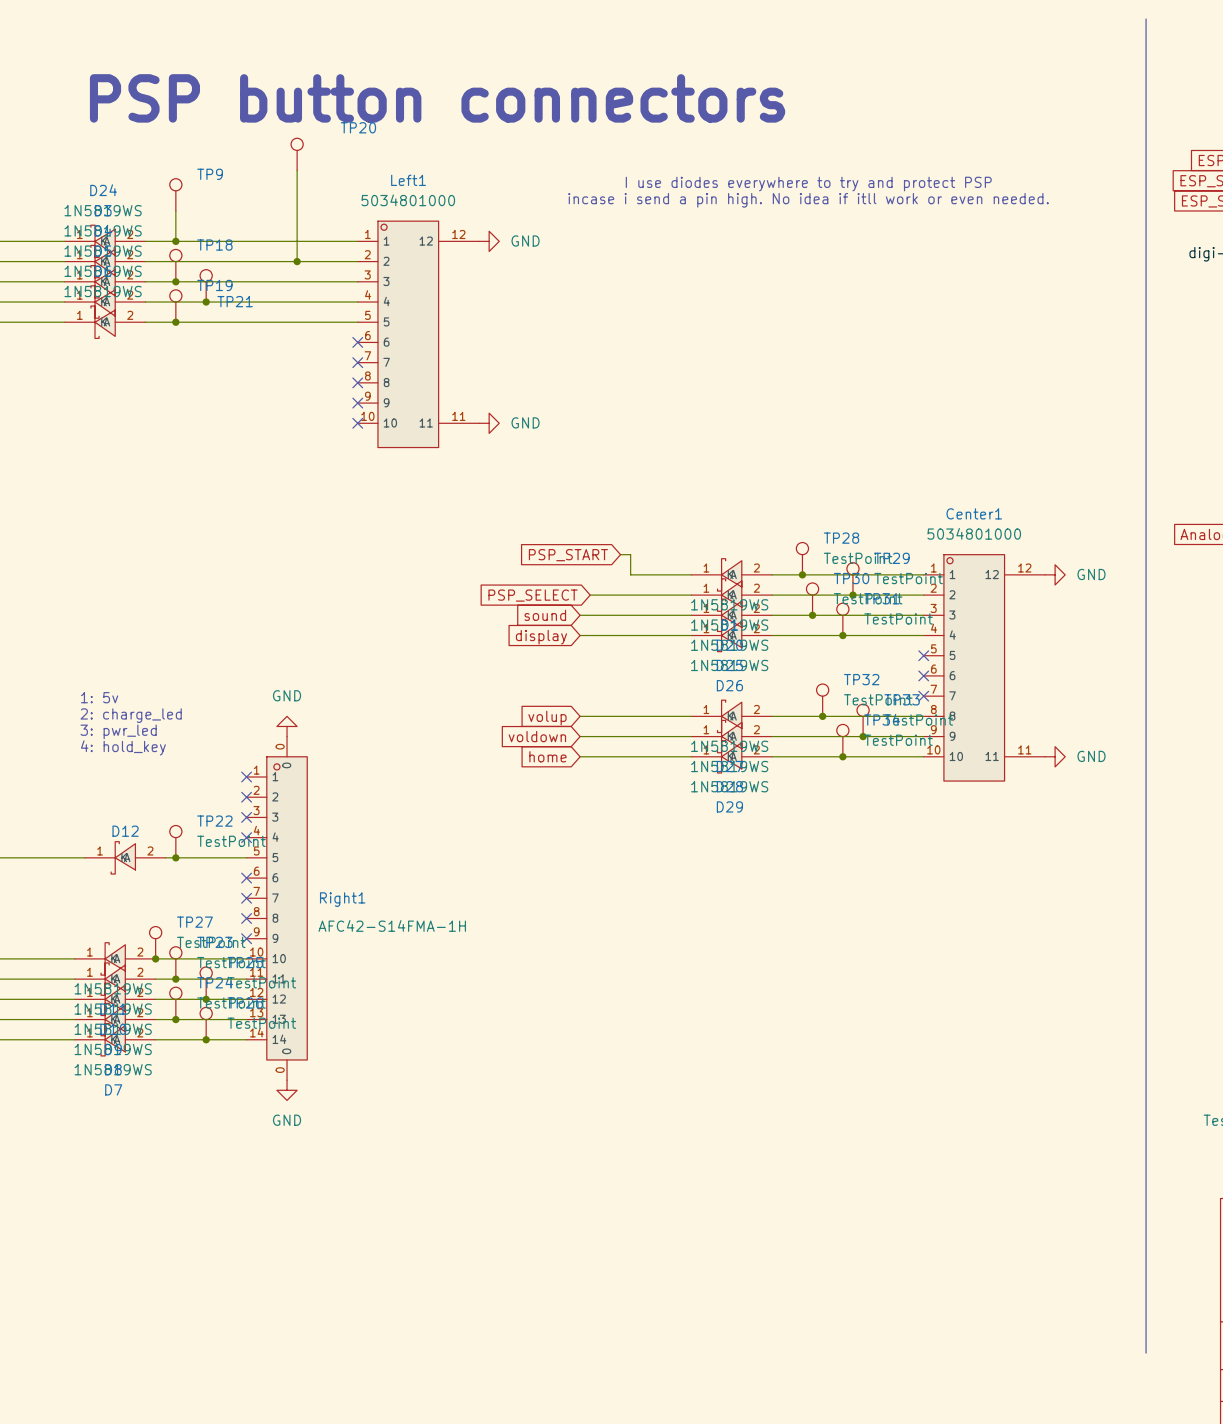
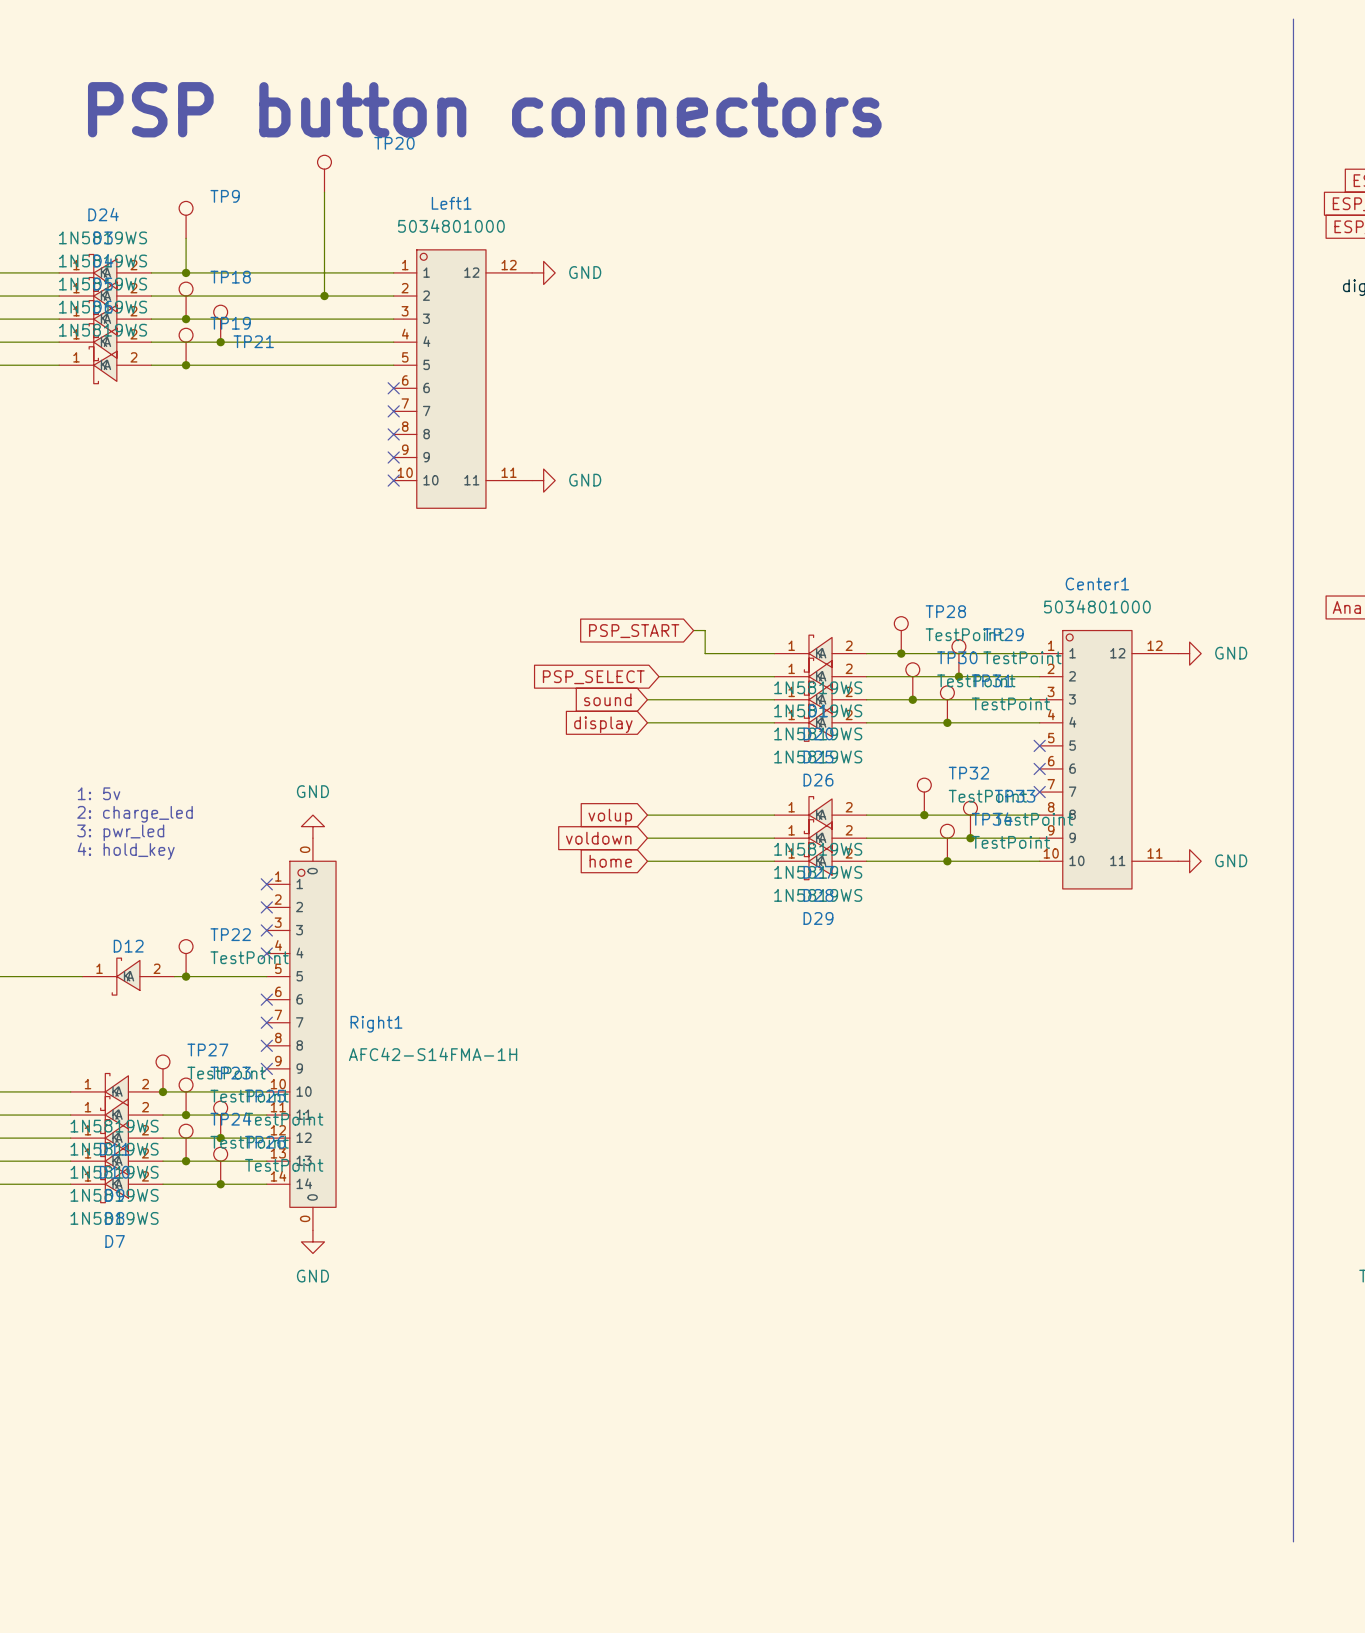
text: I use diodes everywhere to try and protect PSP (808, 184) -> none
text: incase i send a pin high. No idea if itll work or even needed. (808, 200) -> none

